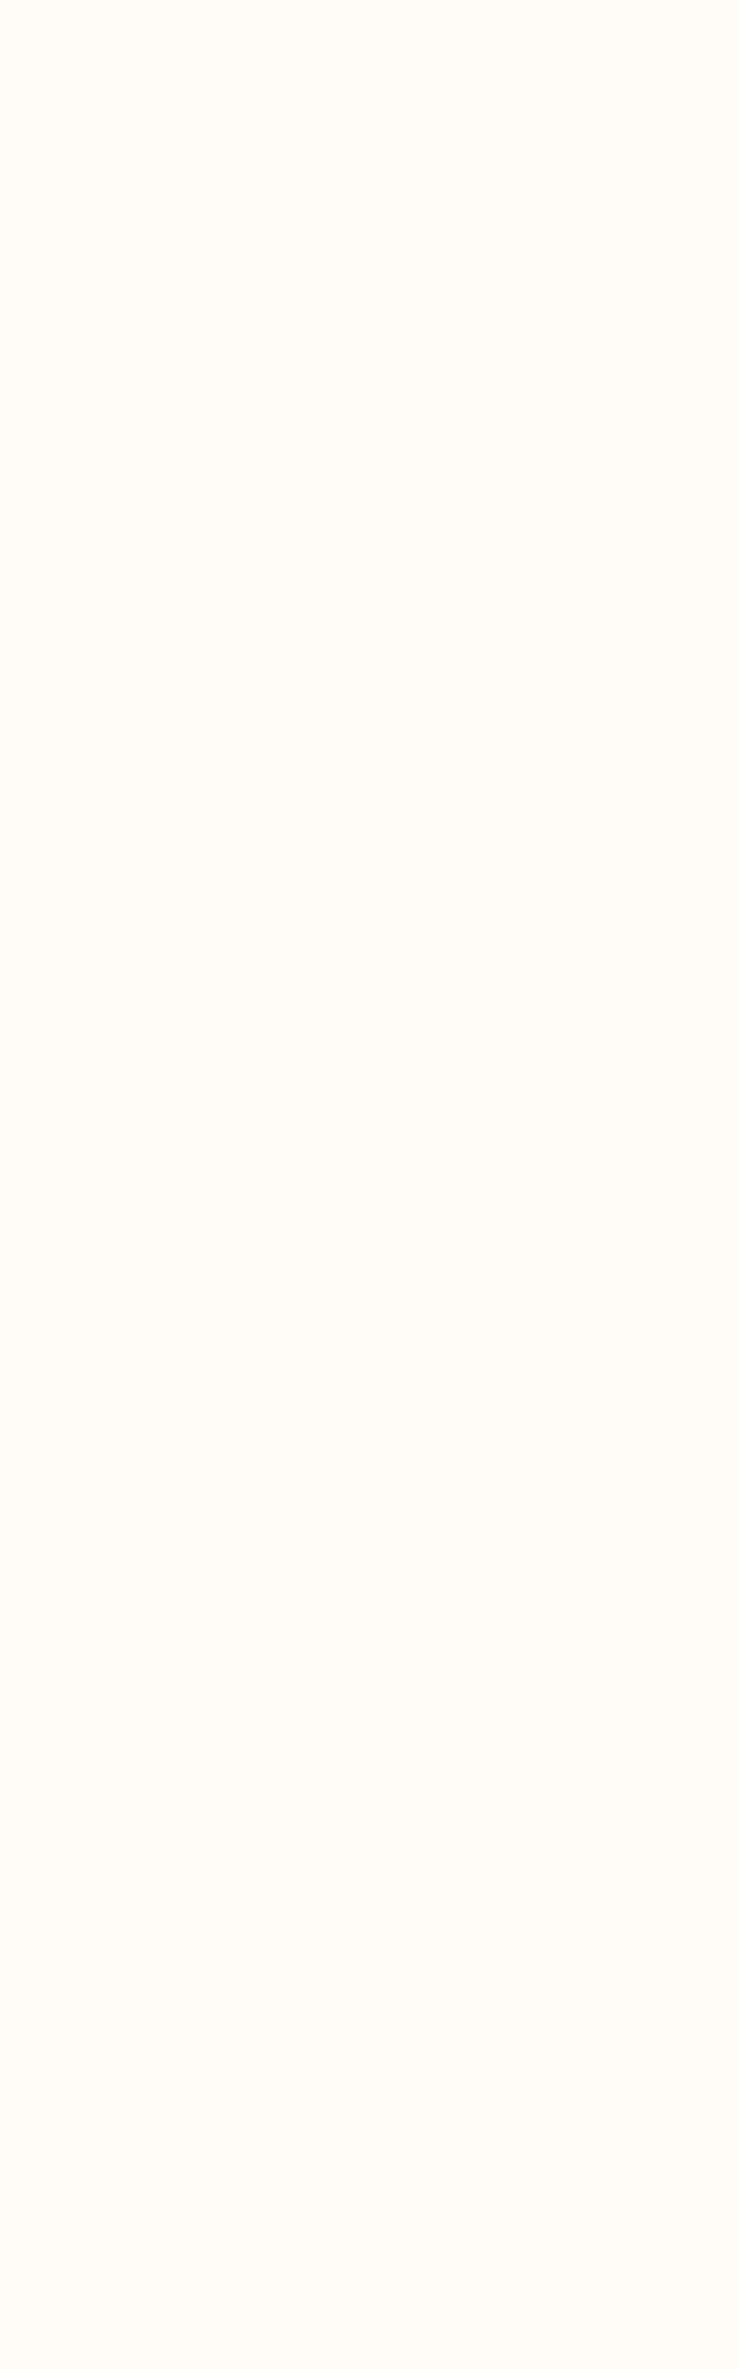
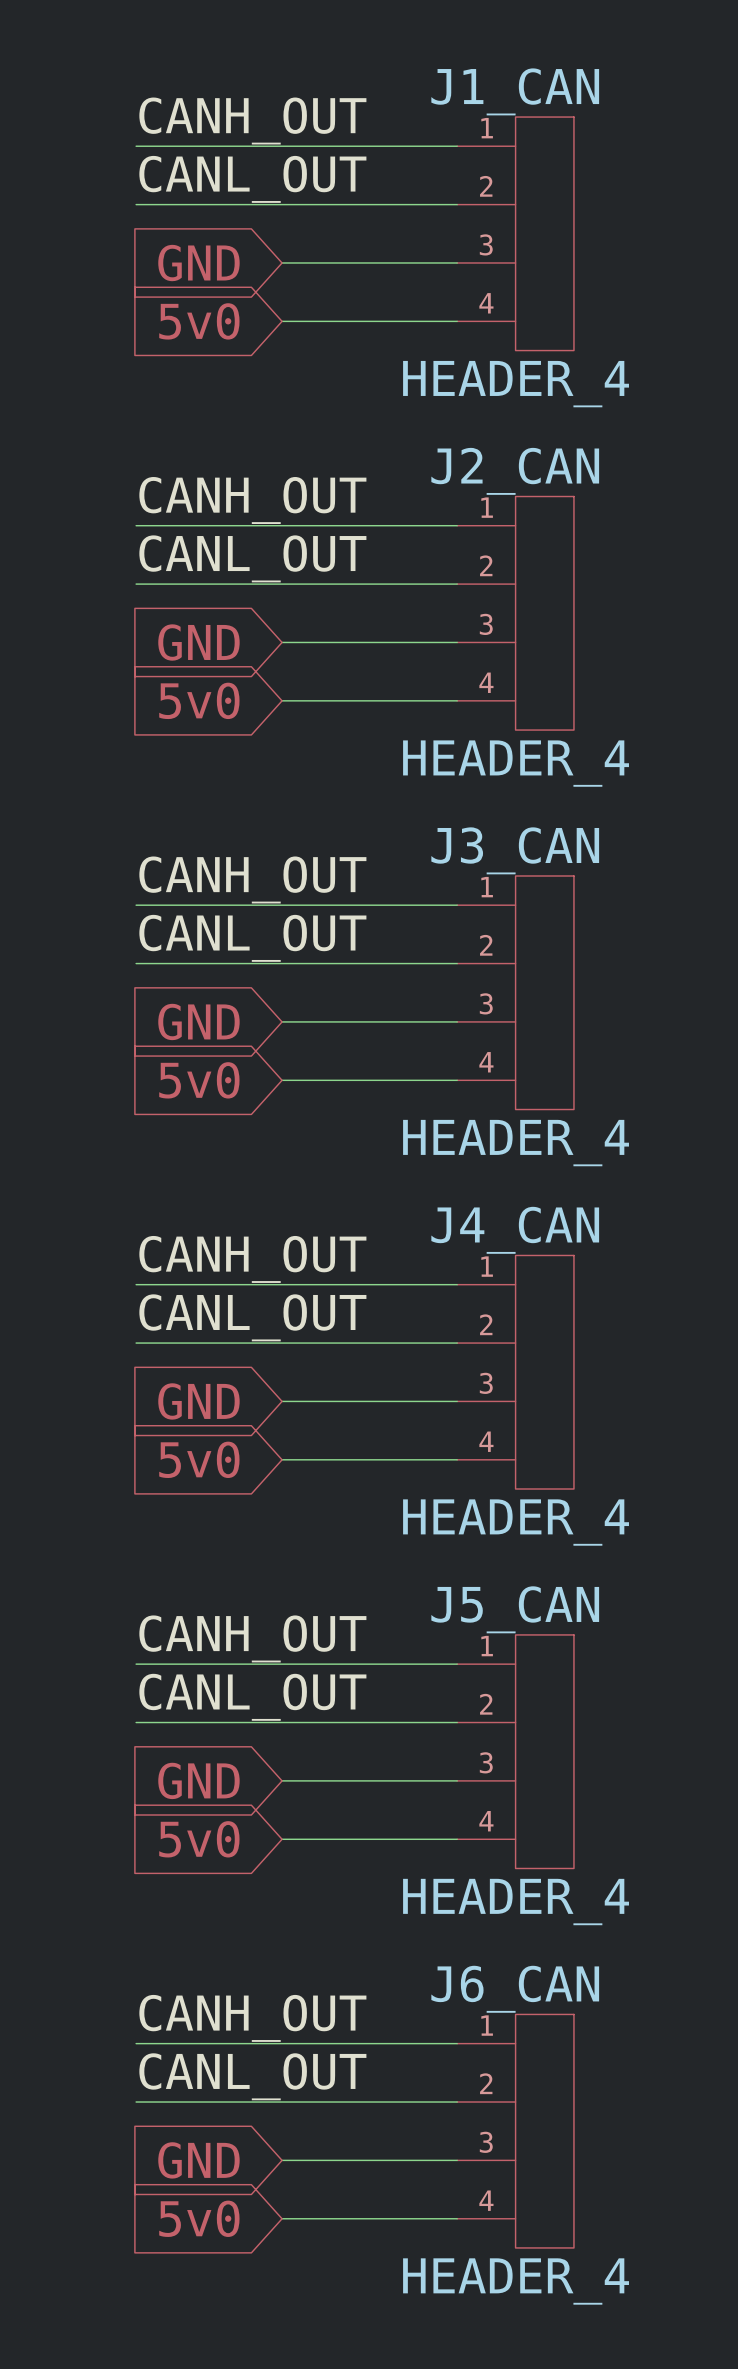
label: none -> CANH_OUT (252, 121)
wire: none -> (136, 146) (457, 146)
label: none -> CANL_OUT (252, 179)
wire: none -> (136, 204) (457, 204)
J1_CAN: none -> HEADER_4 (515, 233)
global label: none -> GND (198, 263)
wire: none -> (282, 262) (457, 262)
global label: none -> 5v0 (199, 321)
wire: none -> (282, 321) (457, 321)
label: none -> CANH_OUT (252, 500)
wire: none -> (136, 525) (457, 525)
label: none -> CANL_OUT (252, 558)
wire: none -> (136, 584) (457, 584)
J2_CAN: none -> HEADER_4 (515, 613)
global label: none -> GND (198, 642)
wire: none -> (282, 642) (457, 642)
global label: none -> 5v0 (199, 700)
wire: none -> (282, 700) (457, 700)
label: none -> CANH_OUT (252, 879)
wire: none -> (136, 905) (457, 905)
label: none -> CANL_OUT (252, 938)
wire: none -> (136, 963) (457, 963)
J3_CAN: none -> HEADER_4 (515, 992)
global label: none -> GND (198, 1021)
wire: none -> (282, 1021) (457, 1021)
global label: none -> 5v0 (199, 1080)
wire: none -> (282, 1080) (457, 1080)
label: none -> CANH_OUT (252, 1259)
wire: none -> (136, 1284) (457, 1284)
label: none -> CANL_OUT (252, 1317)
wire: none -> (136, 1343) (457, 1343)
J4_CAN: none -> HEADER_4 (515, 1372)
global label: none -> GND (198, 1401)
wire: none -> (282, 1401) (457, 1401)
global label: none -> 5v0 (199, 1459)
wire: none -> (282, 1459) (457, 1459)
label: none -> CANH_OUT (252, 1638)
wire: none -> (136, 1664) (457, 1664)
label: none -> CANL_OUT (252, 1697)
wire: none -> (136, 1722) (457, 1722)
J5_CAN: none -> HEADER_4 (515, 1751)
global label: none -> GND (198, 1780)
wire: none -> (282, 1780) (457, 1780)
global label: none -> 5v0 (199, 1839)
wire: none -> (282, 1839) (457, 1839)
label: none -> CANH_OUT (252, 2018)
wire: none -> (136, 2043) (457, 2043)
label: none -> CANL_OUT (252, 2076)
wire: none -> (136, 2102) (457, 2102)
J6_CAN: none -> HEADER_4 (515, 2131)
global label: none -> GND (198, 2160)
wire: none -> (282, 2160) (457, 2160)
global label: none -> 5v0 (199, 2218)
wire: none -> (282, 2218) (457, 2218)

